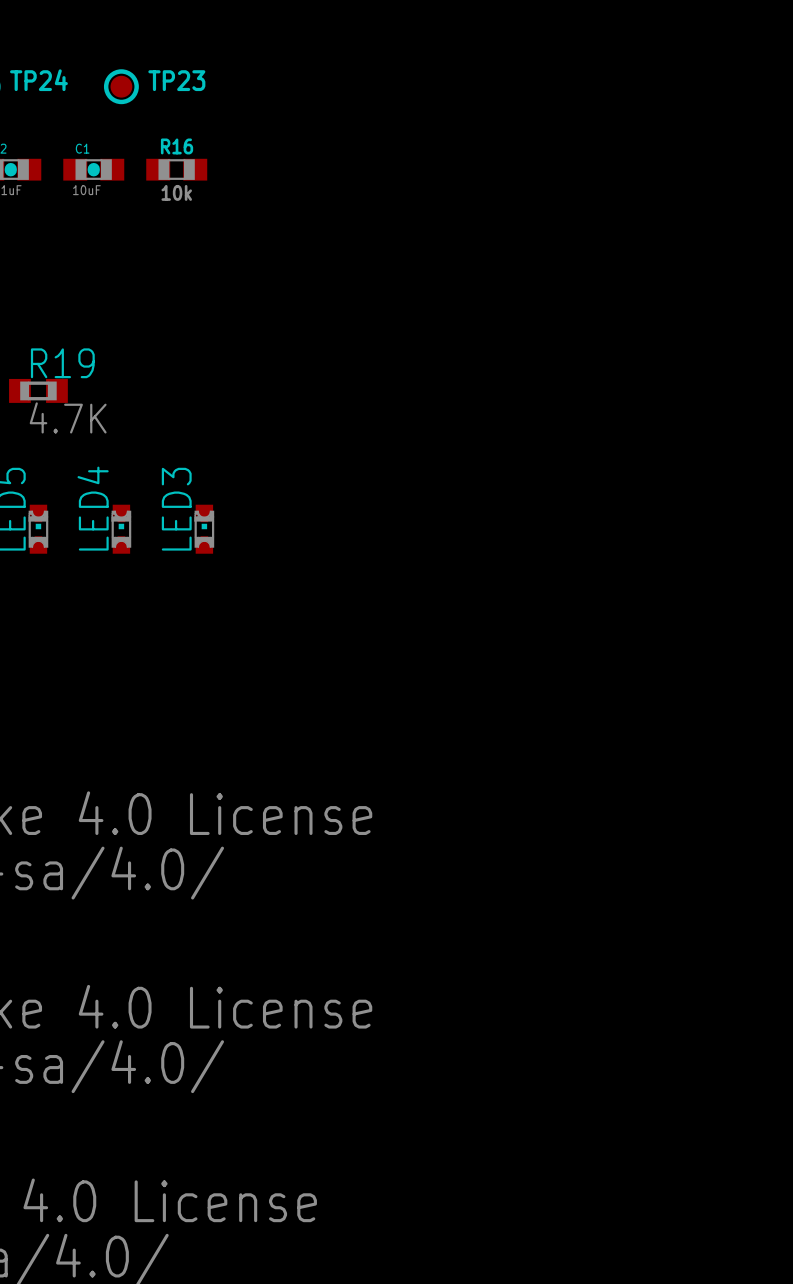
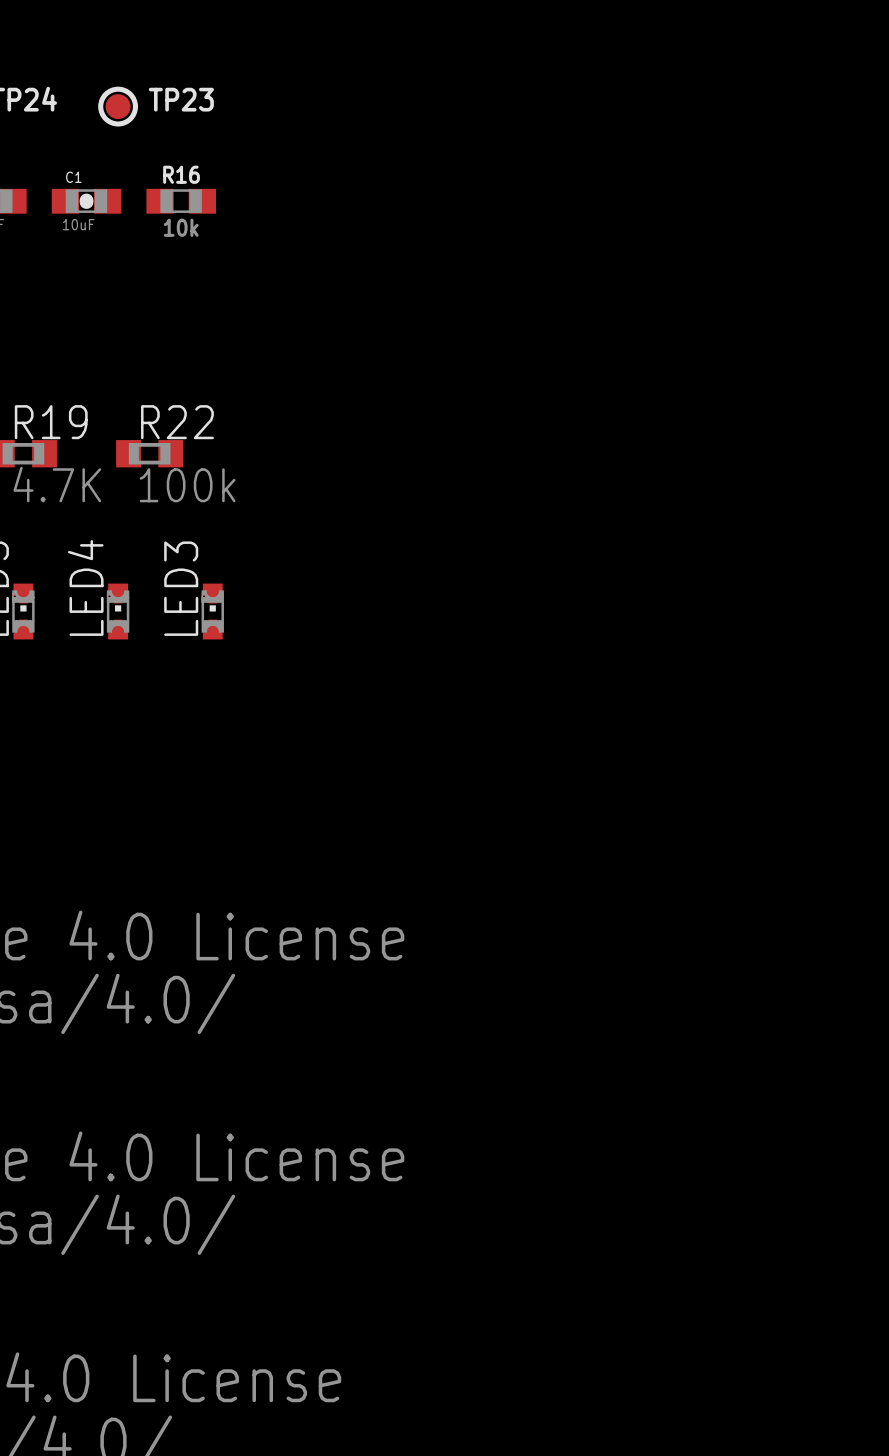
R22: none -> 100k (149, 453)

